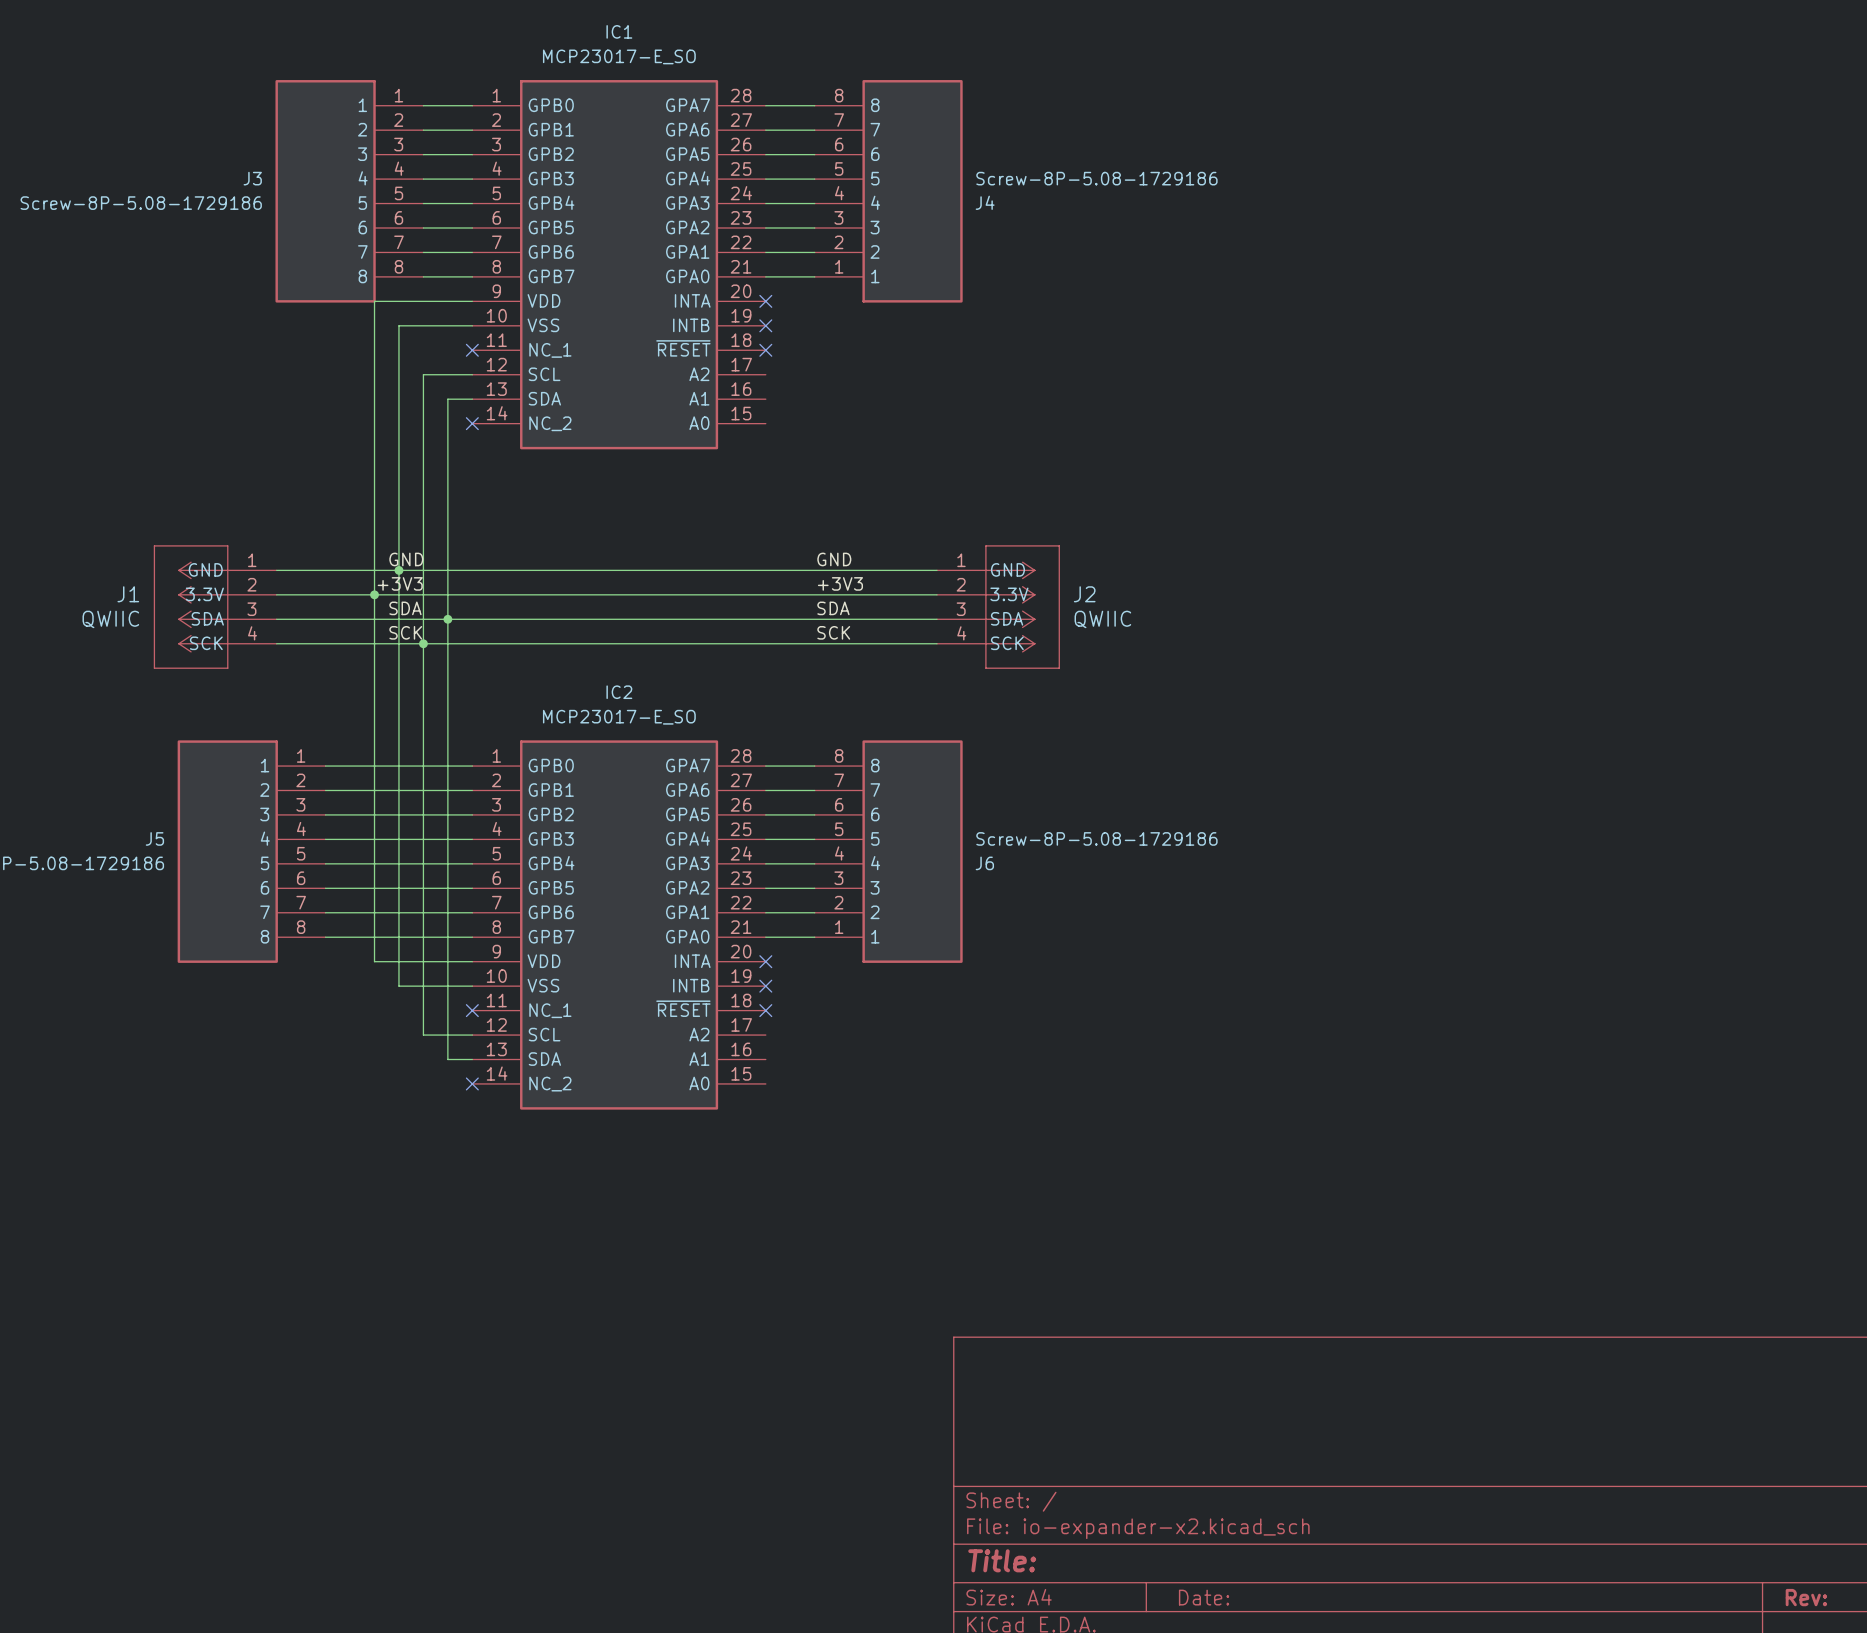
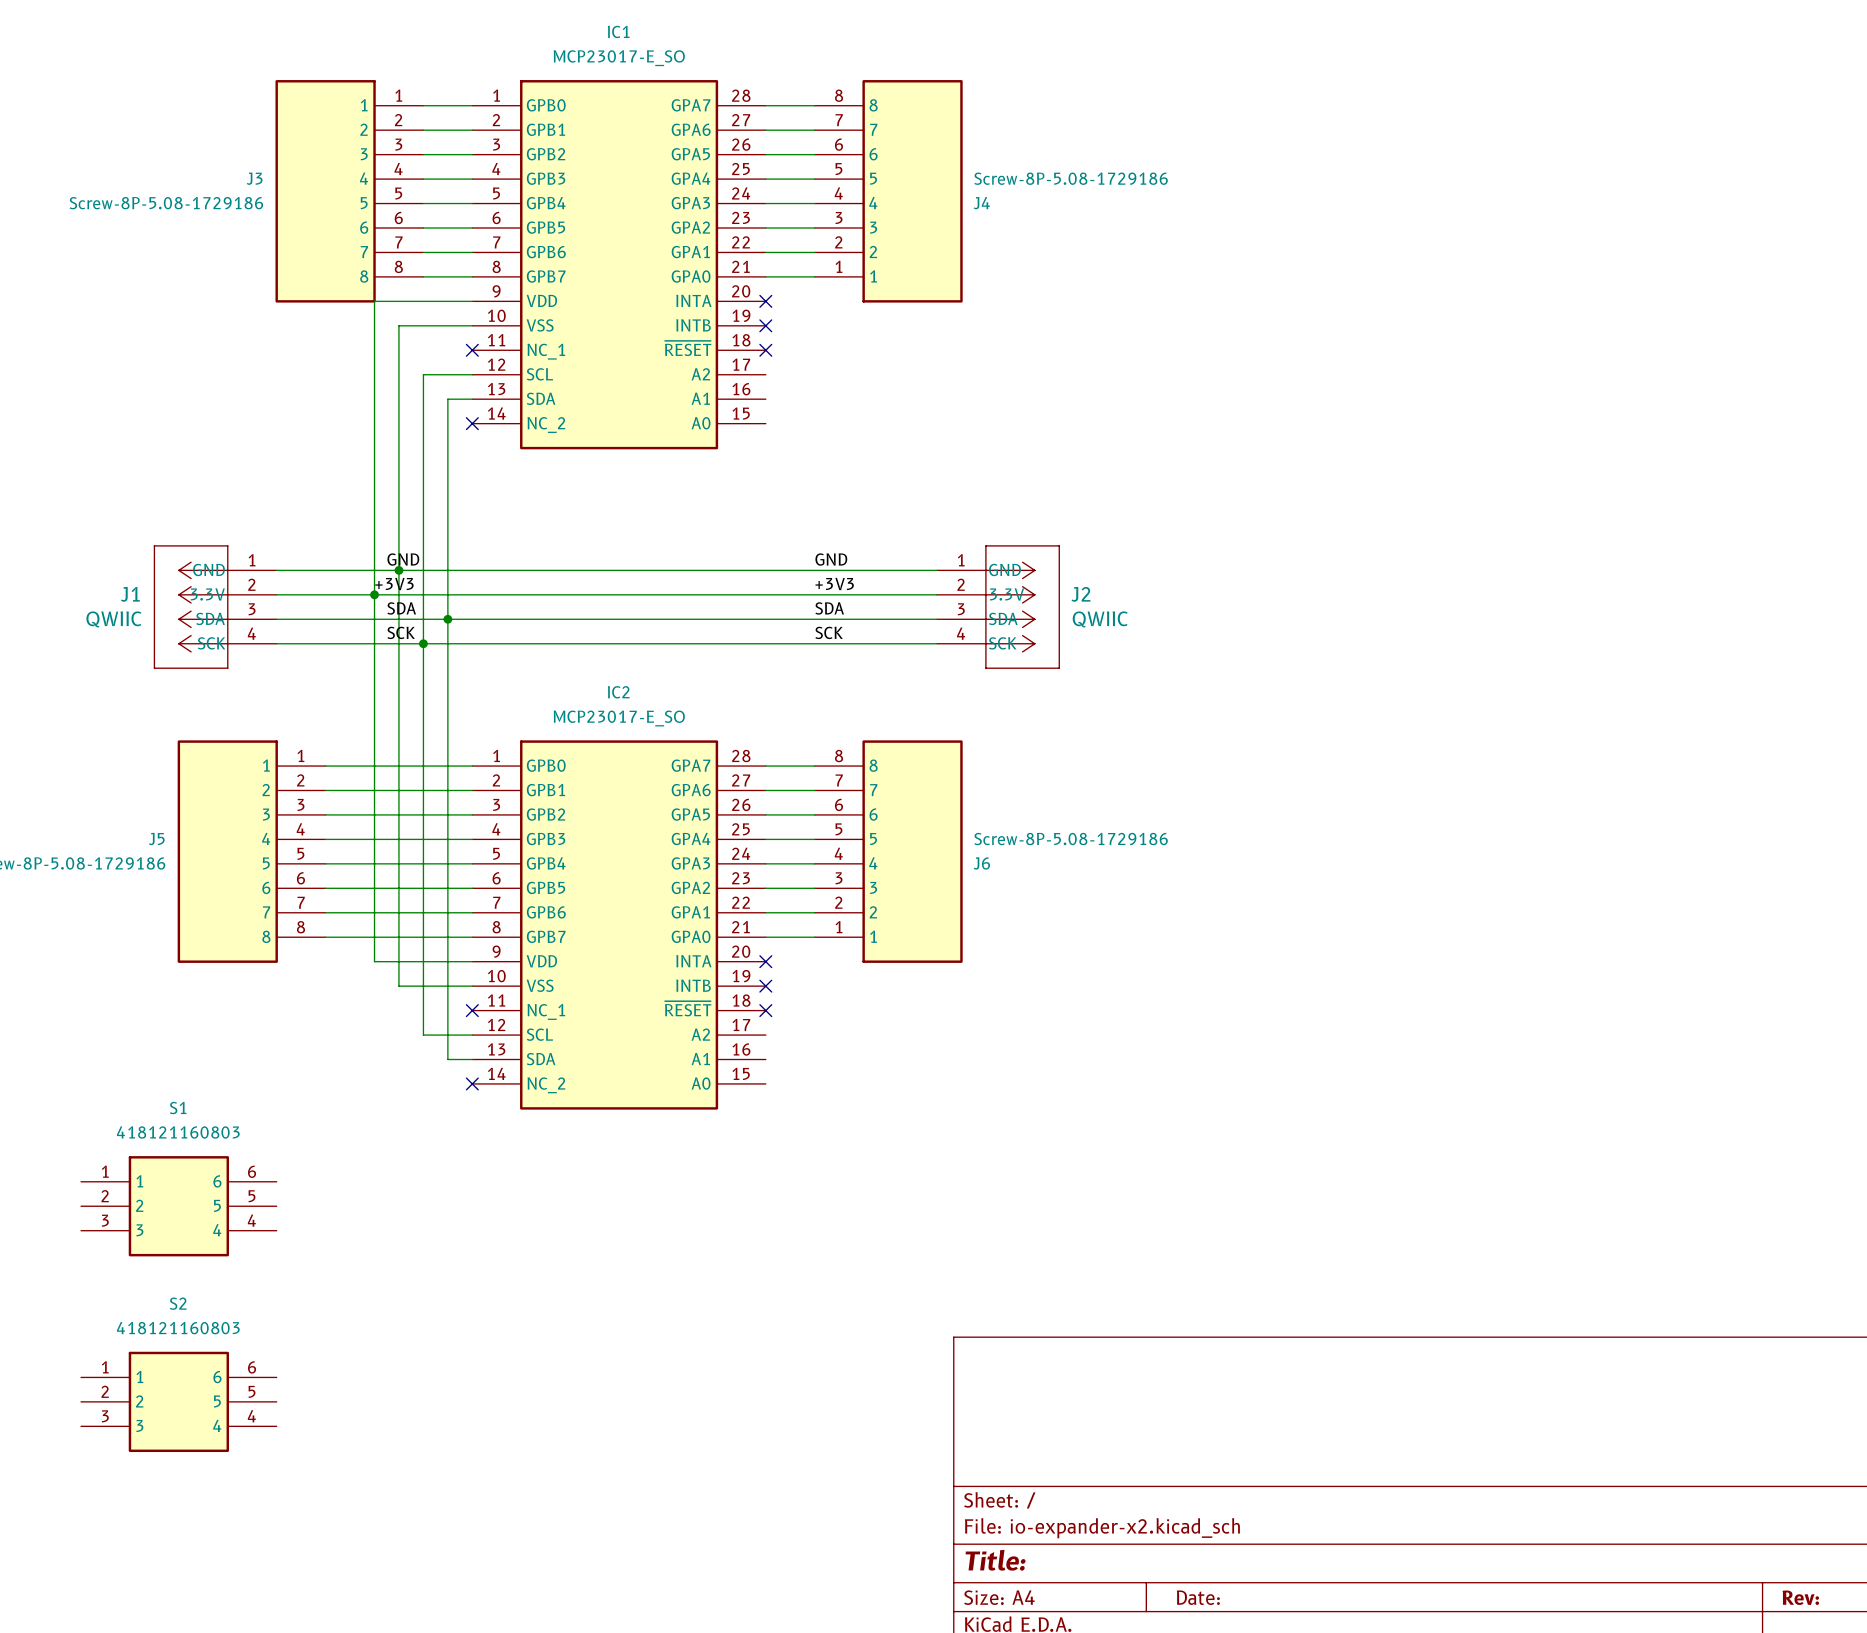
S1: none -> 418121160803 (178, 1206)
S2: none -> 418121160803 (178, 1401)

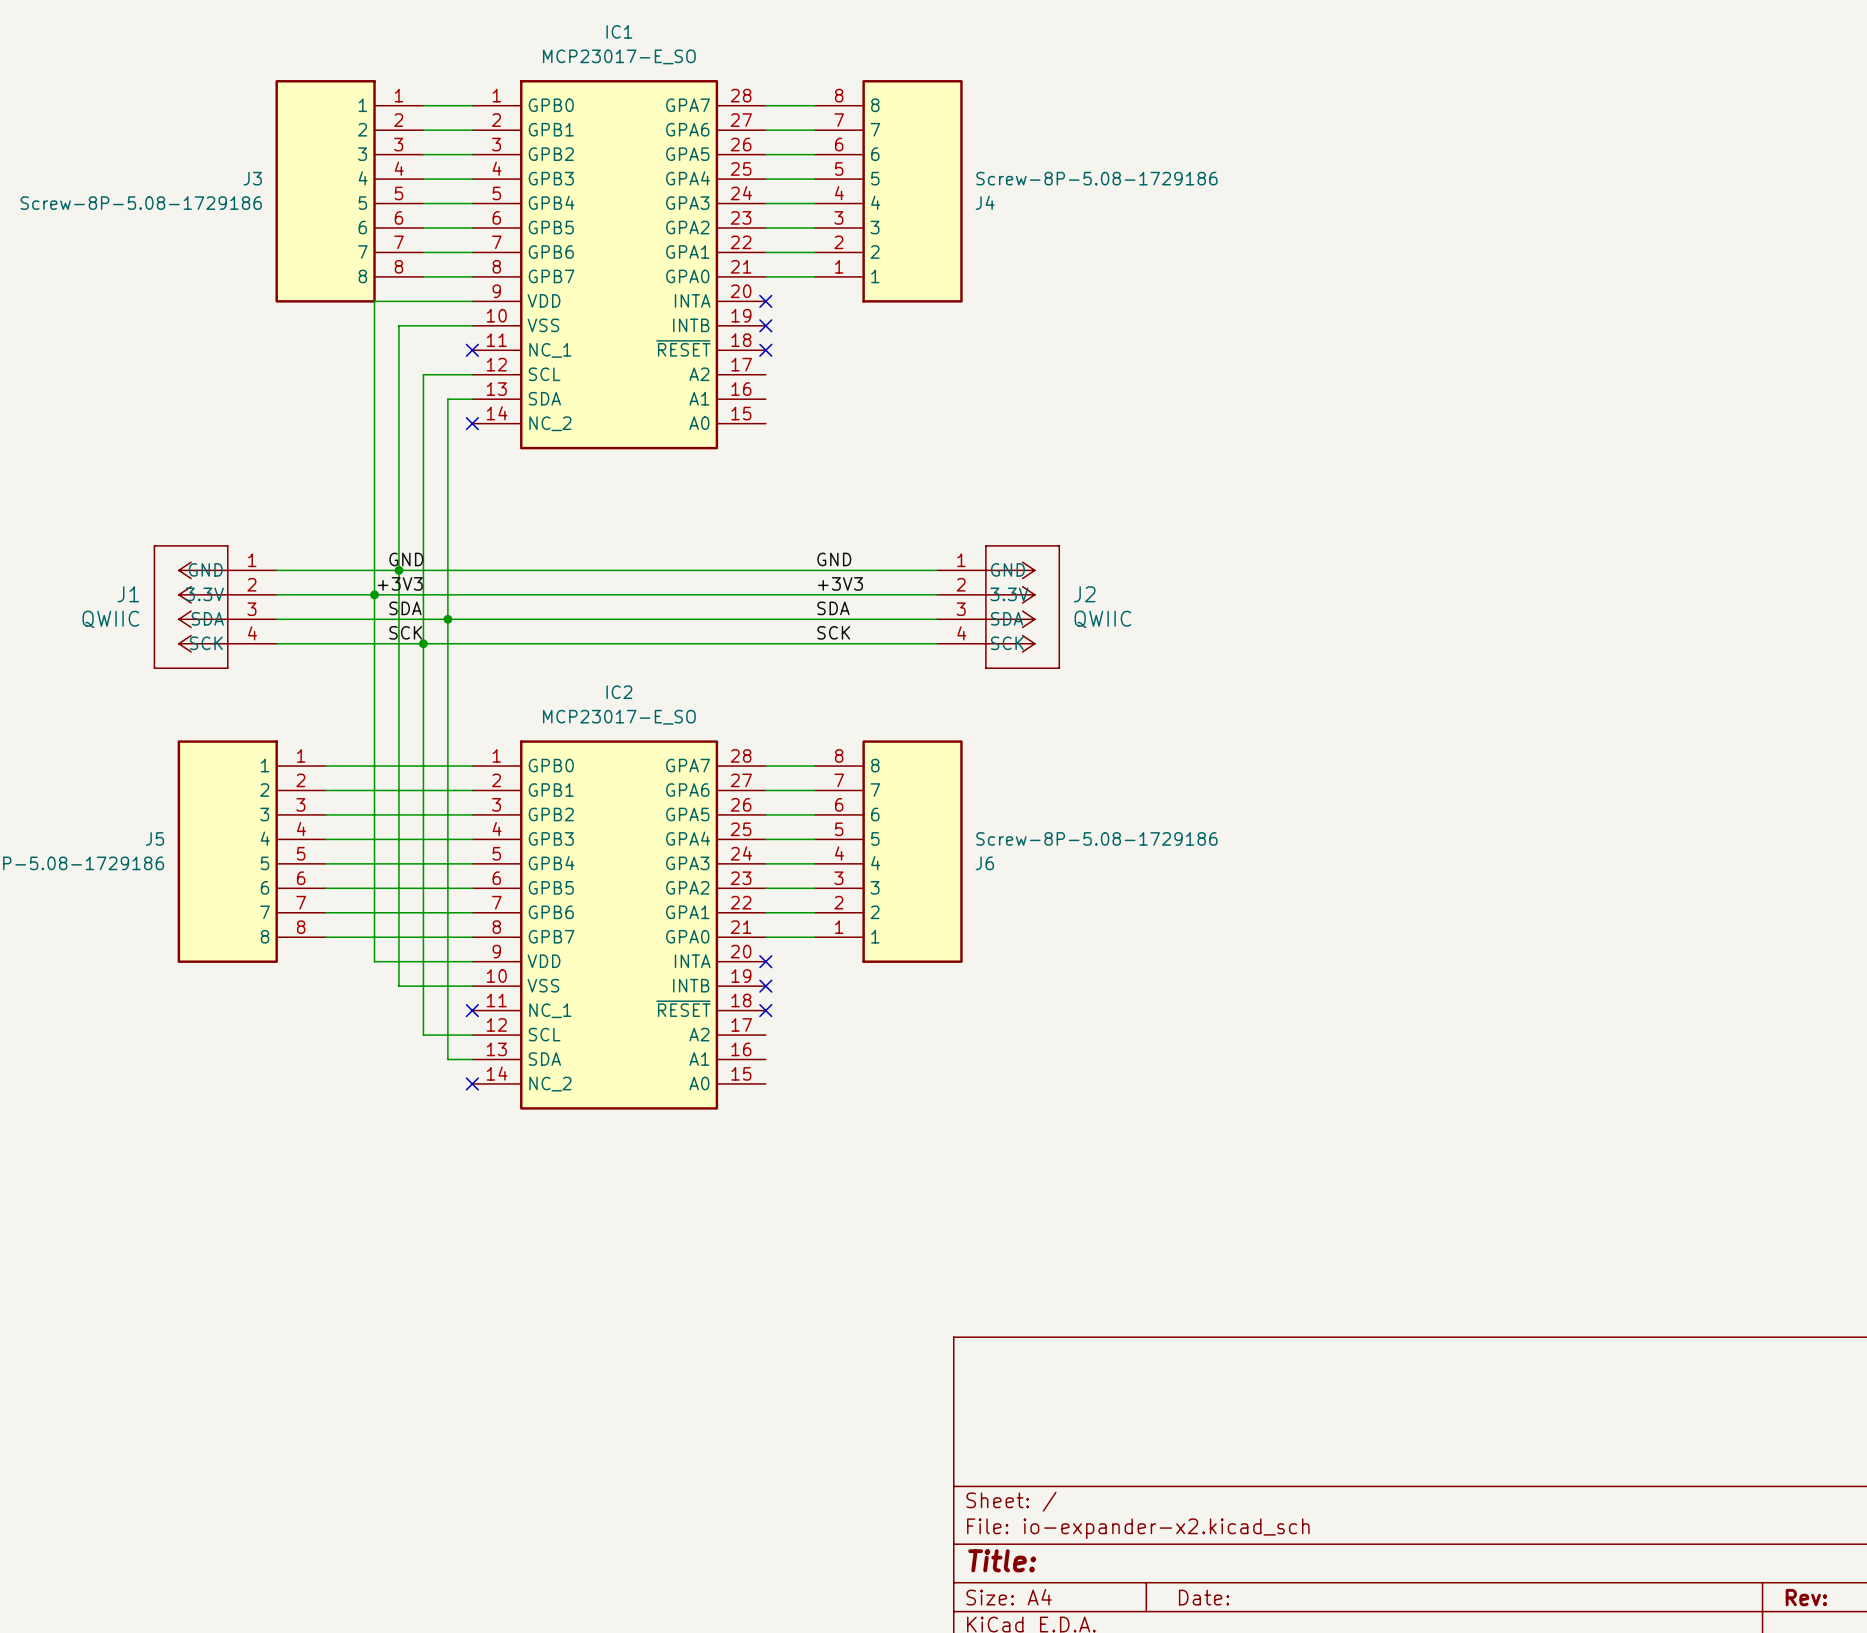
S1: 418121160803 (178, 1206) -> none
S2: 418121160803 (178, 1401) -> none

